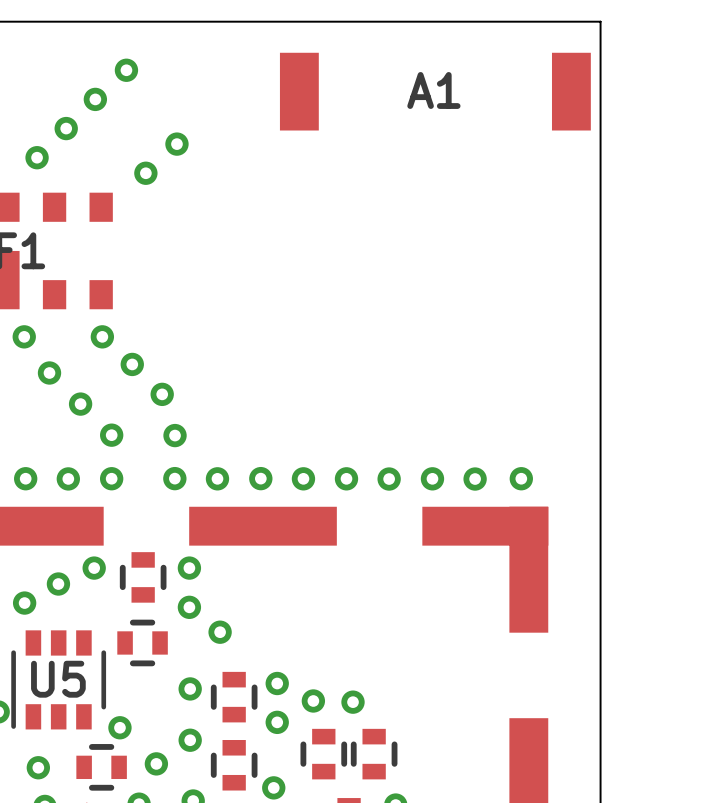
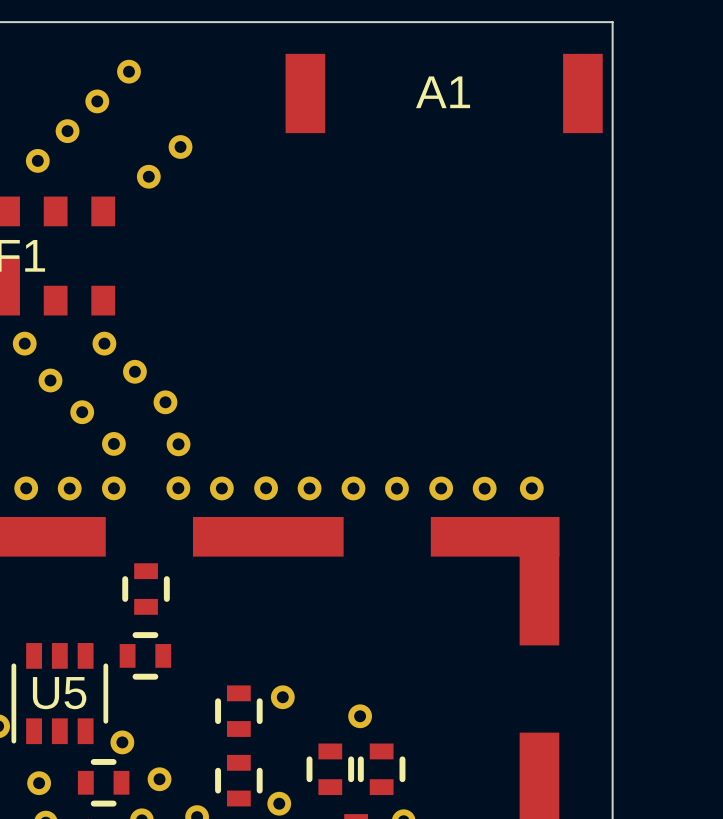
part: (94, 568) -> none
part: (189, 568) -> none
part: (58, 584) -> none
part: (24, 603) -> none
part: (189, 607) -> none
part: (220, 632) -> none
part: (190, 688) -> none
part: (313, 700) -> none
part: (277, 722) -> none
part: (190, 740) -> none

